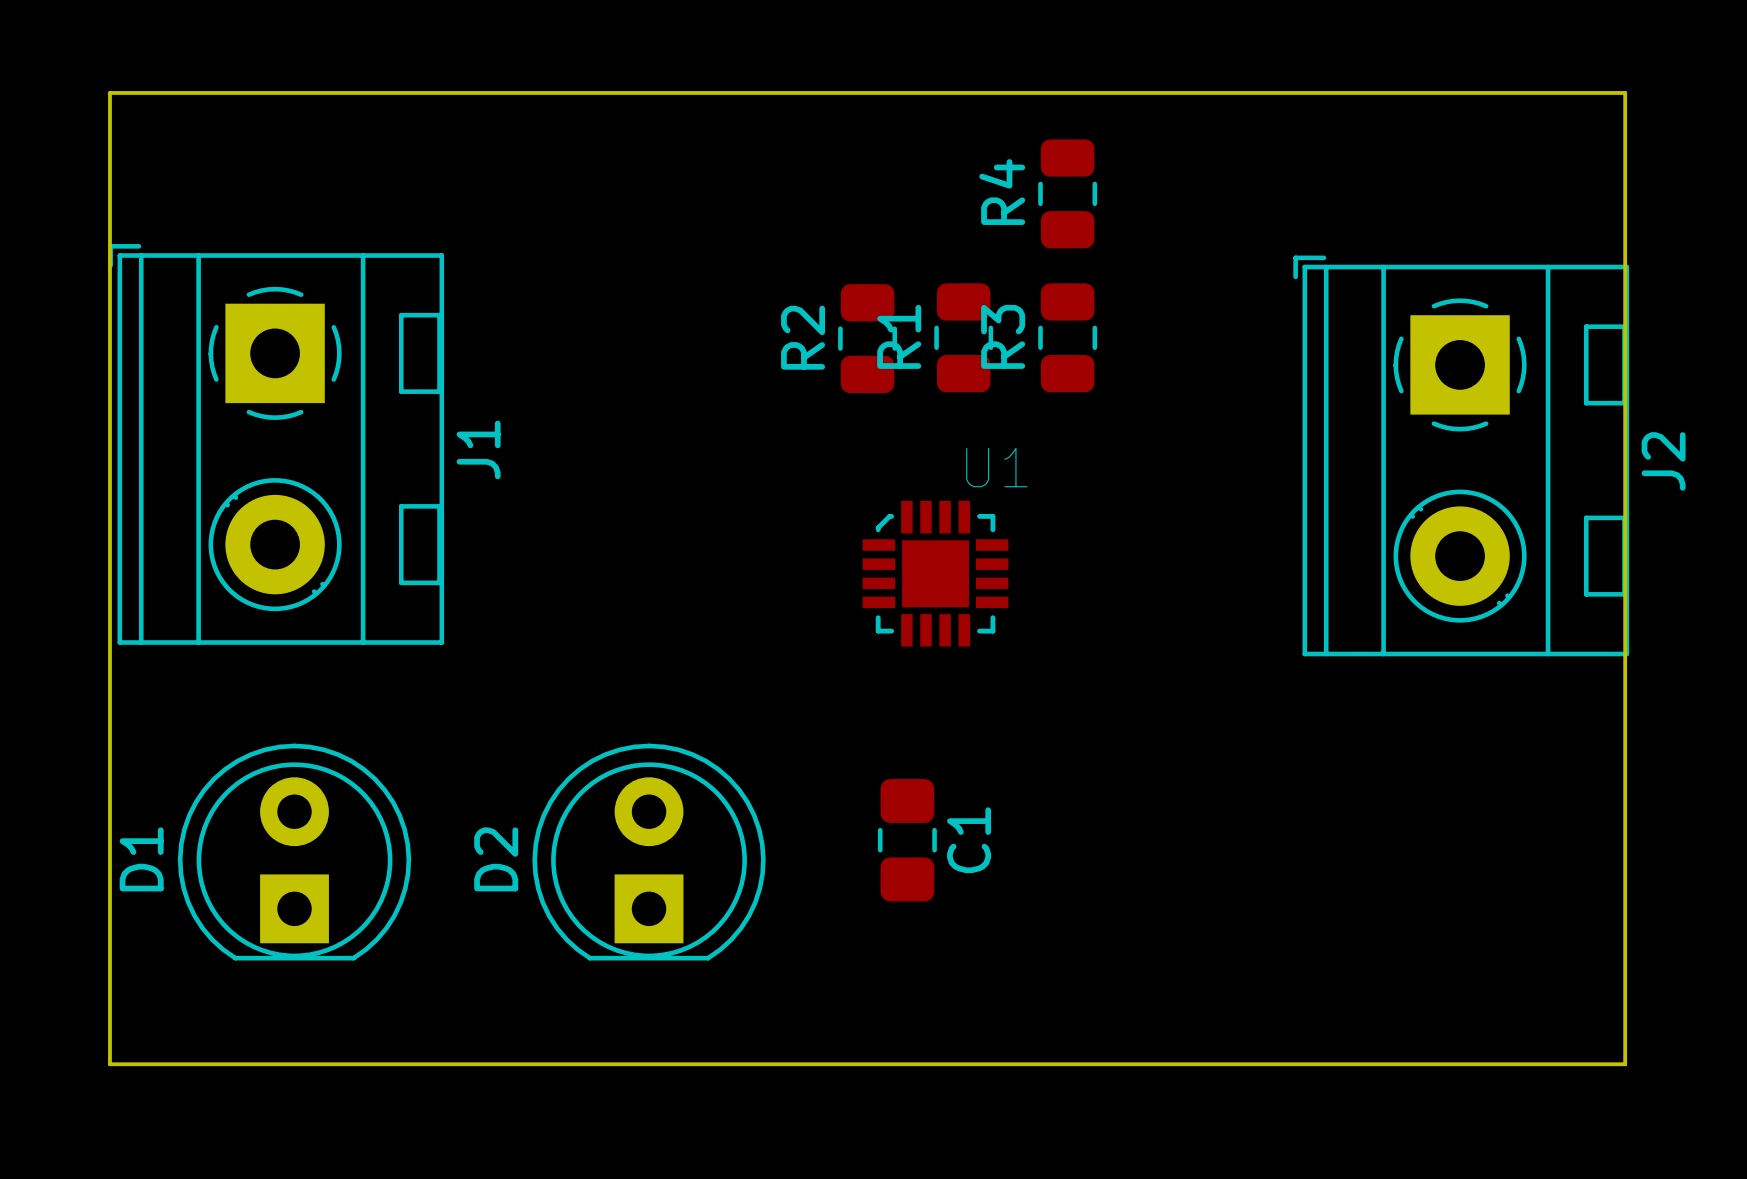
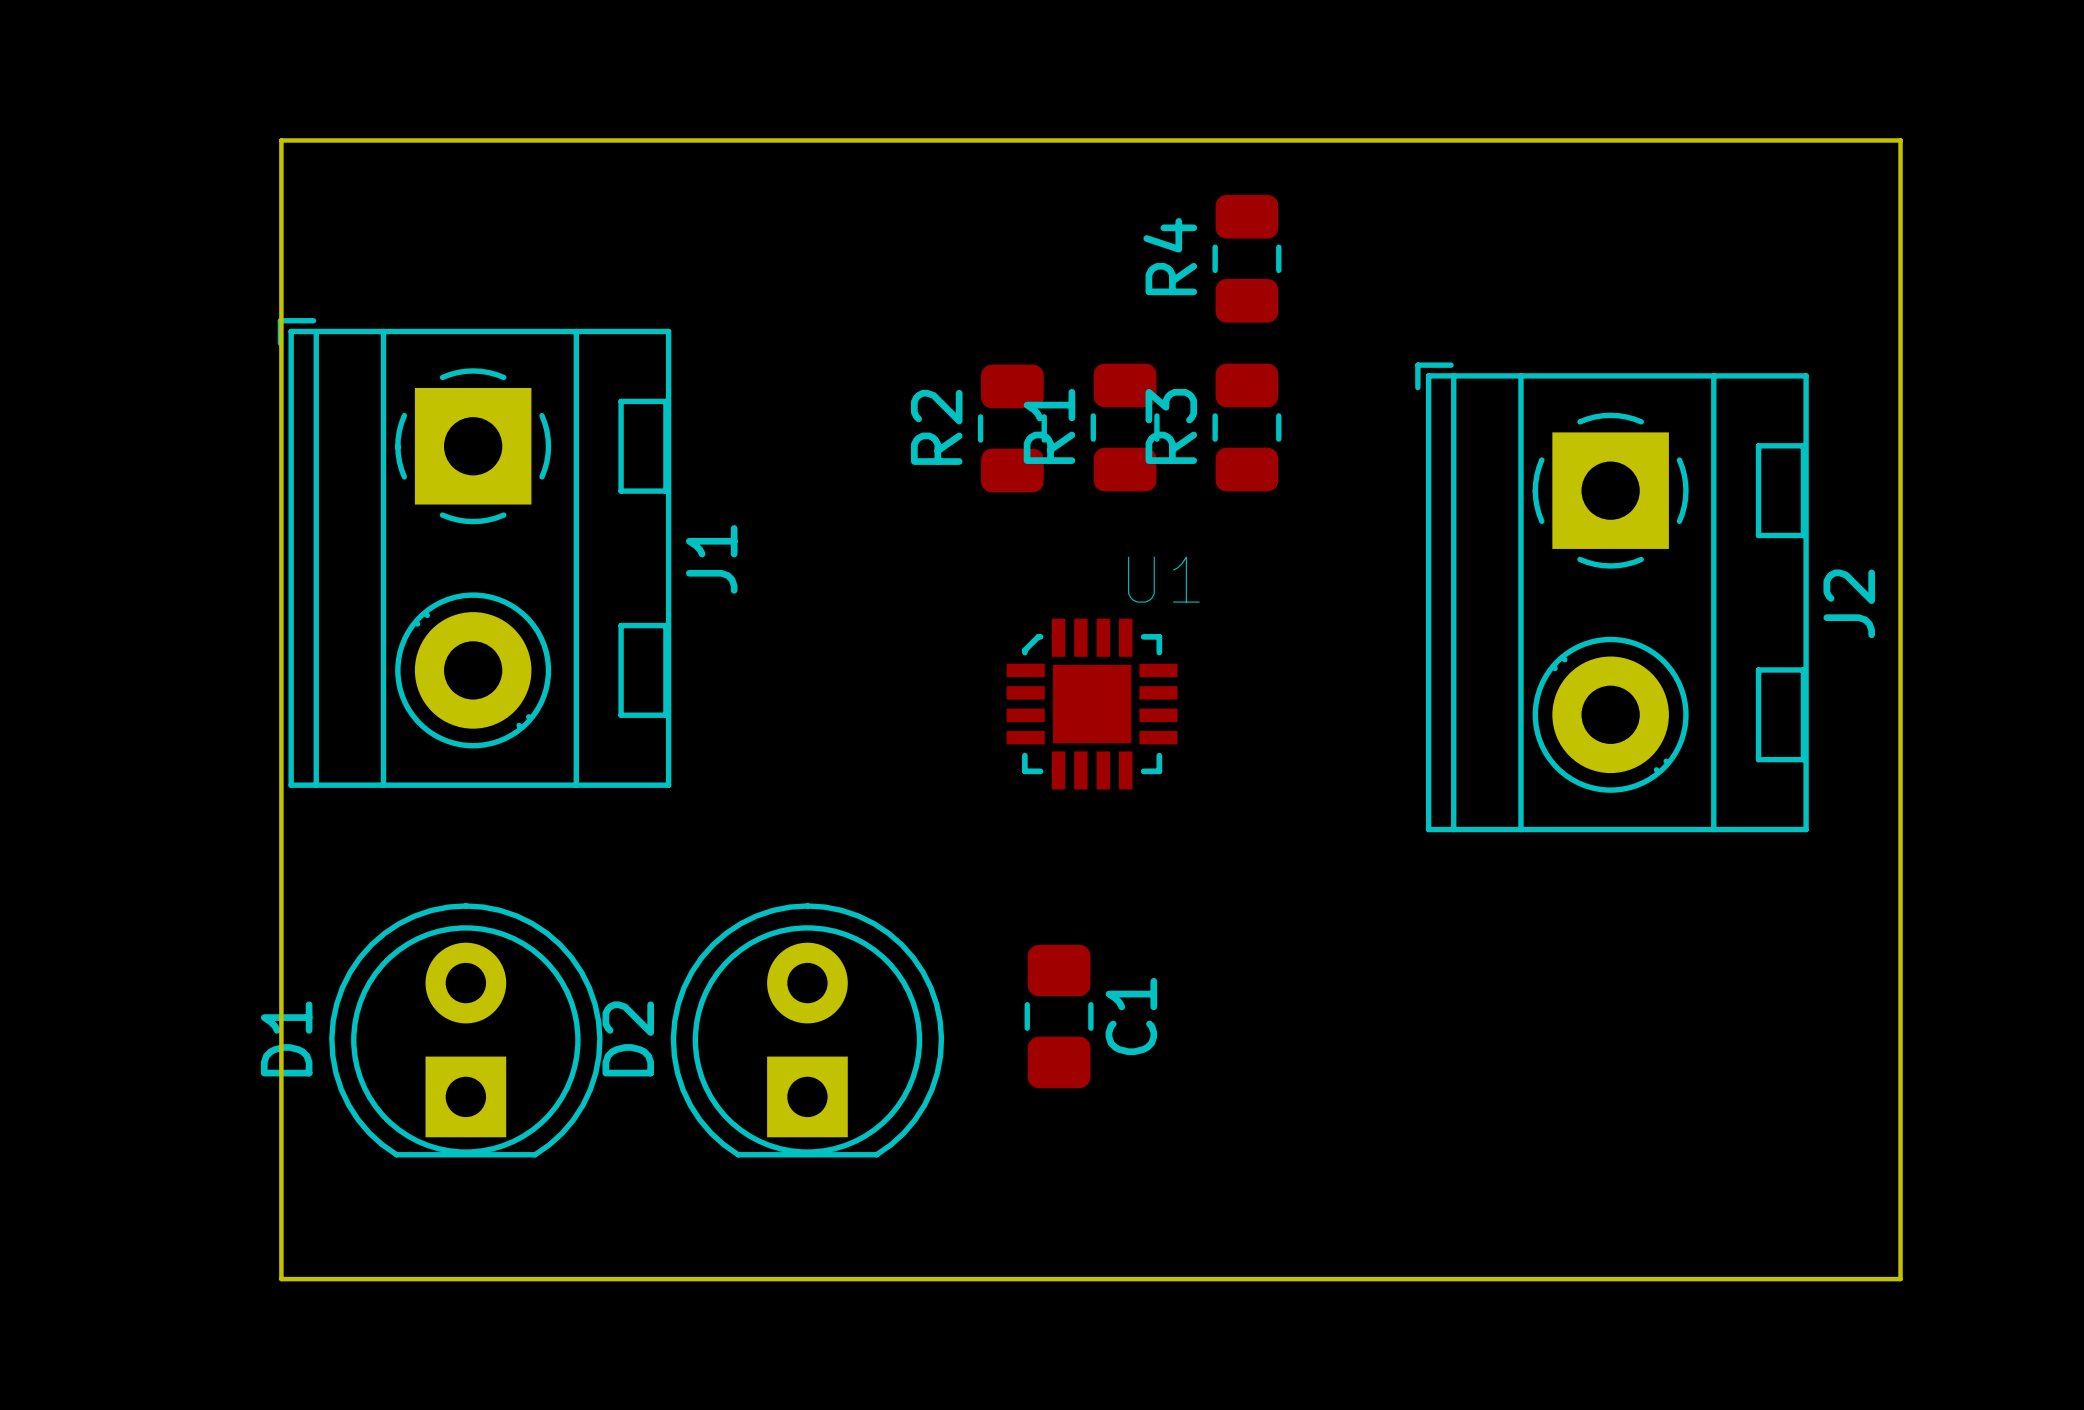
board edge: (244, 92) (109, 92) (109, 1064) (244, 1064) -> (281, 140) (281, 1279)
J1 position: (276, 444) -> (474, 552)
J2 position: (1461, 455) -> (1611, 597)
D2 footprint: [532, 743, 766, 961] -> [670, 903, 945, 1158]
D1 position: (294, 852) -> (465, 1030)

